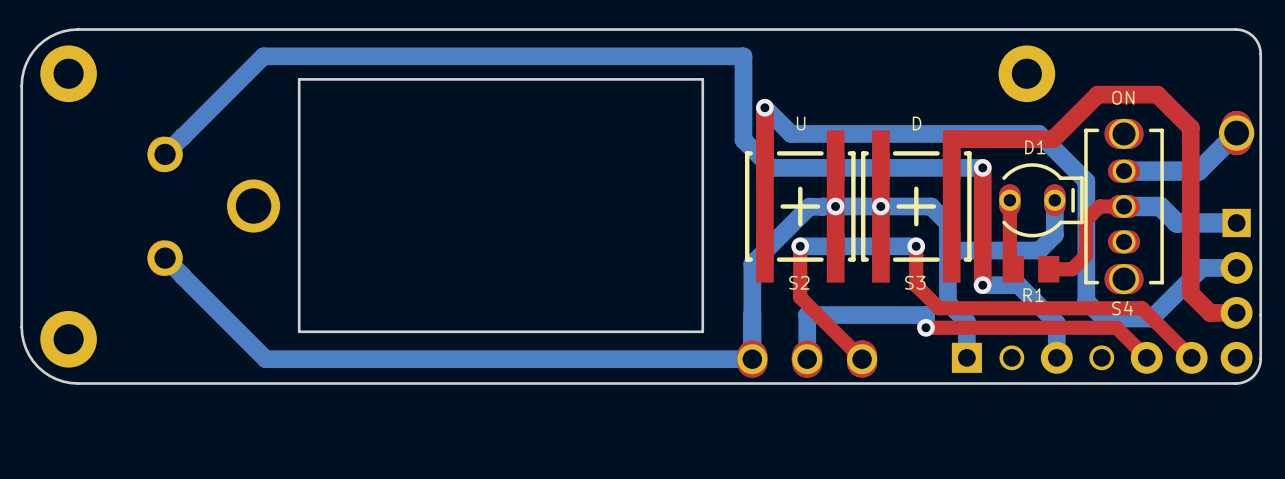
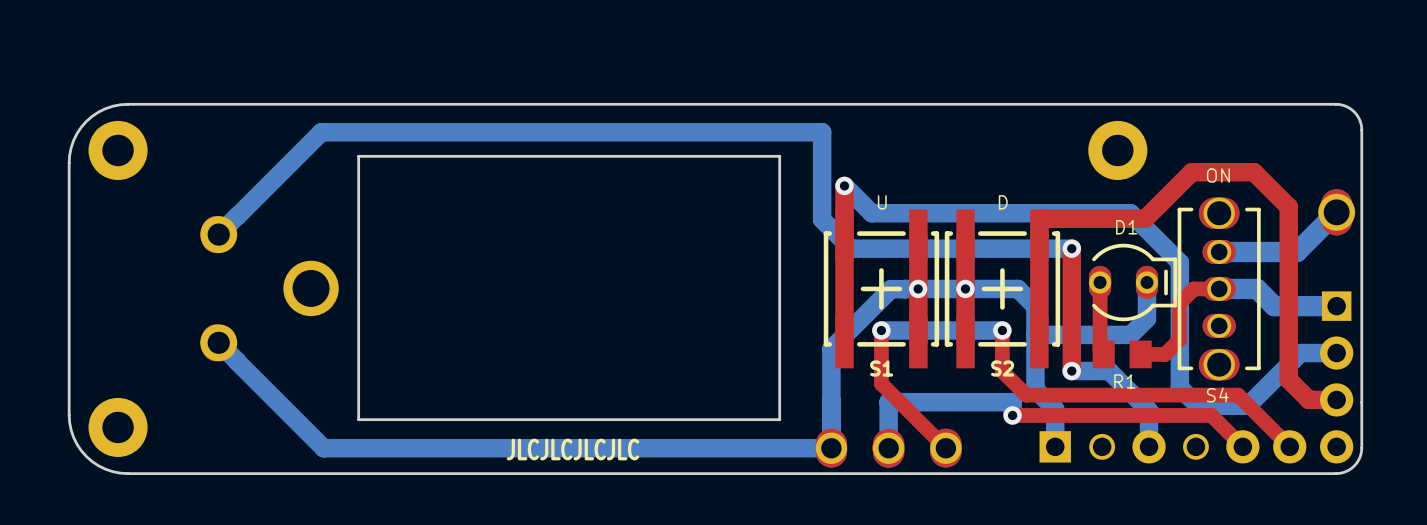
text: S2 (799, 282) -> S1 (881, 368)
text: S3 (915, 282) -> S2 (1002, 368)
text: none -> JLCJLCJLCJLC (572, 449)

